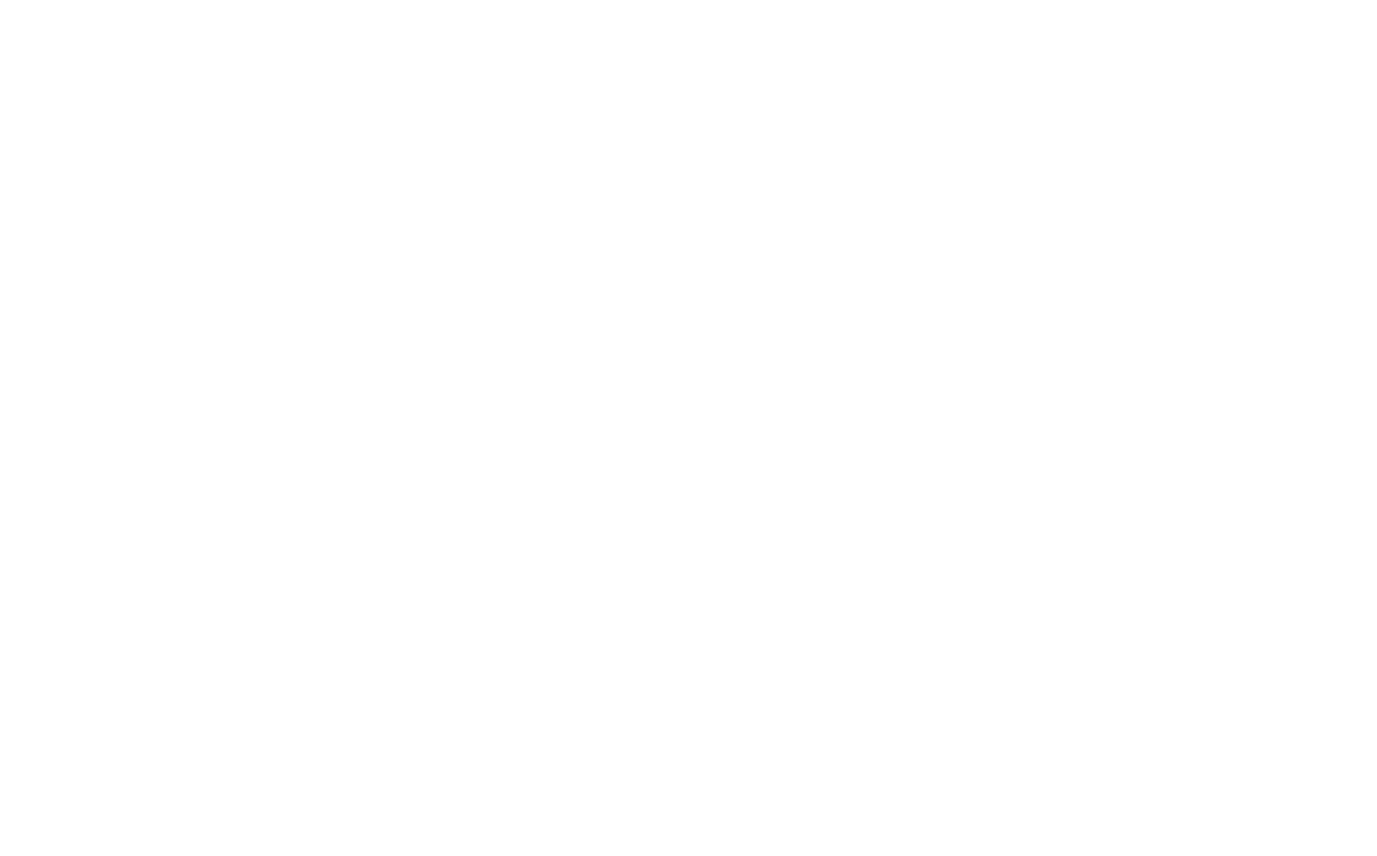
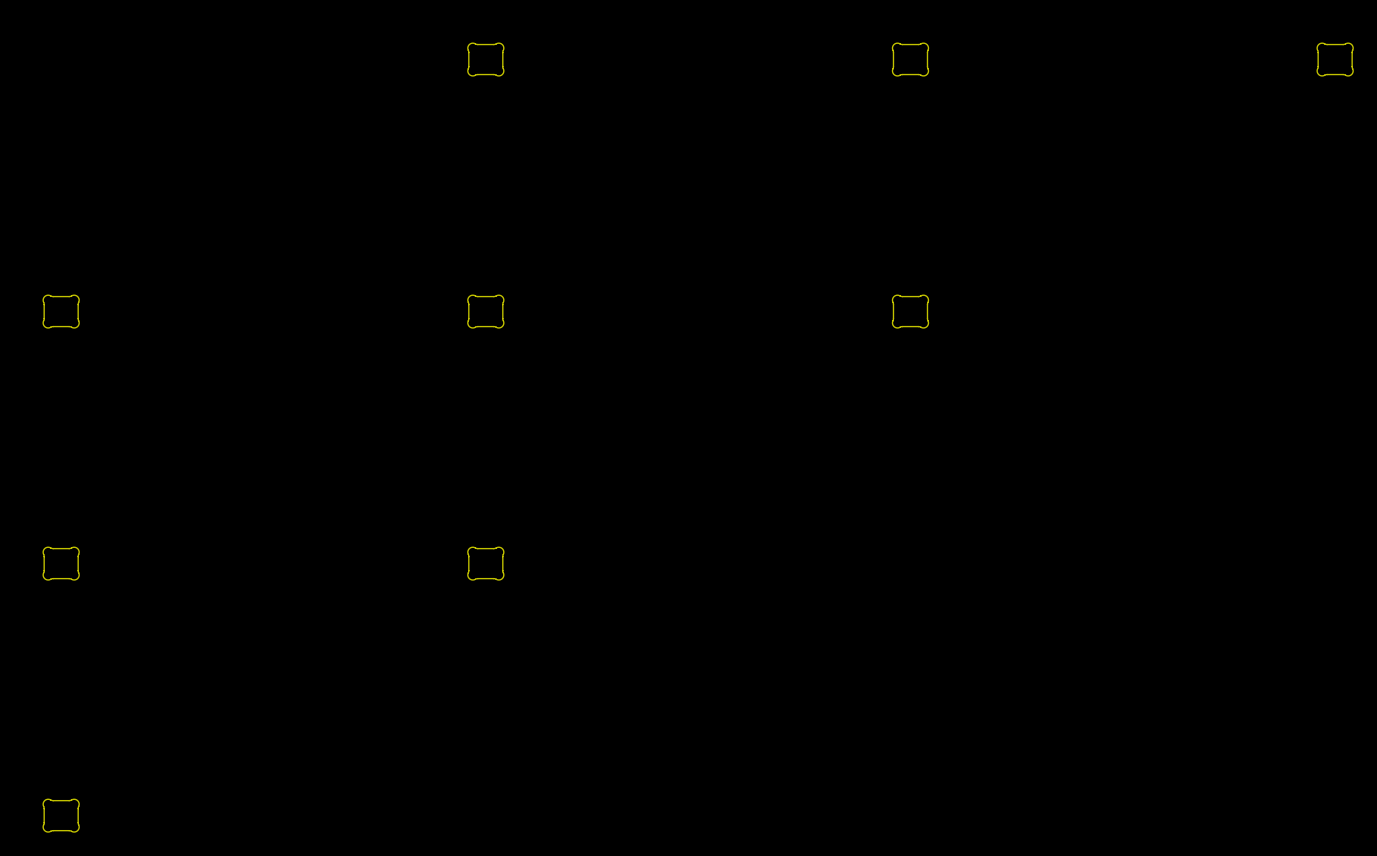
part: none -> (485, 59)
part: none -> (910, 59)
part: none -> (1335, 59)
part: none -> (61, 311)
part: none -> (485, 311)
part: none -> (910, 311)
part: none -> (61, 563)
part: none -> (485, 563)
part: none -> (61, 815)

